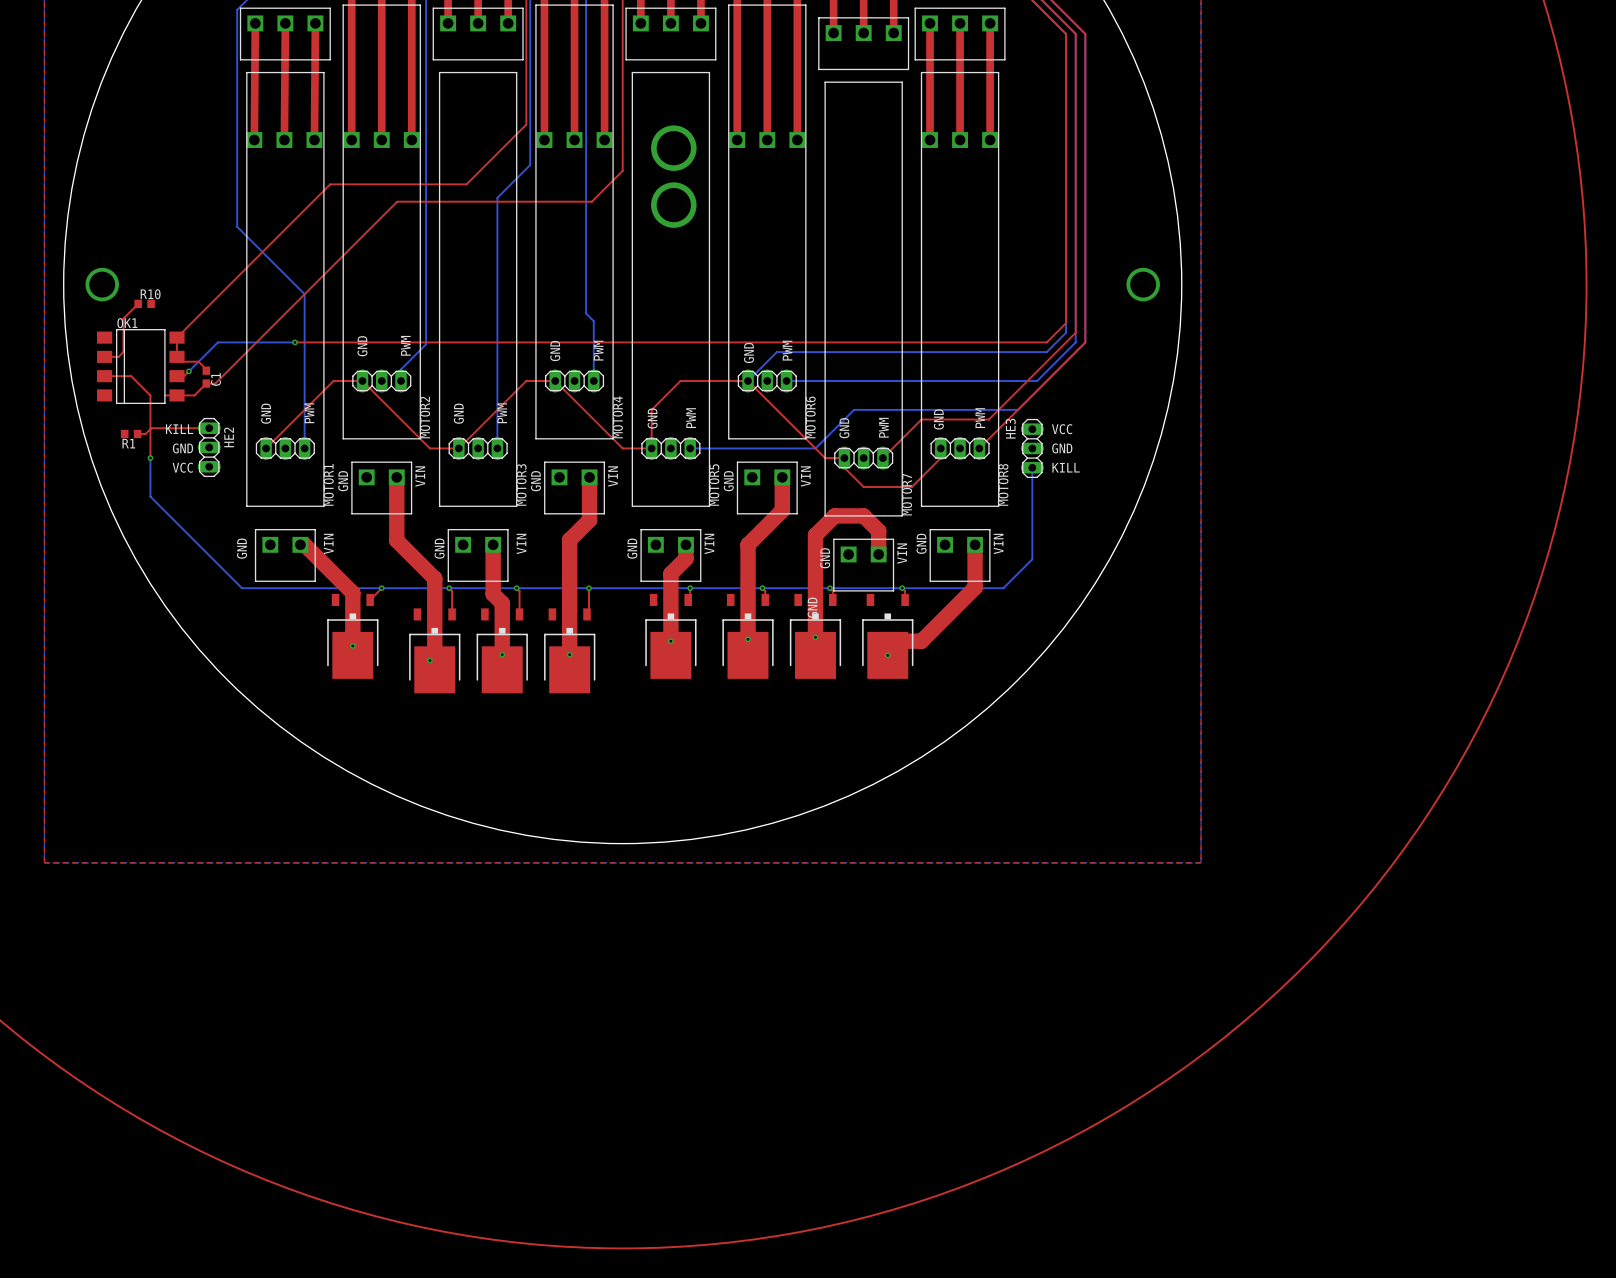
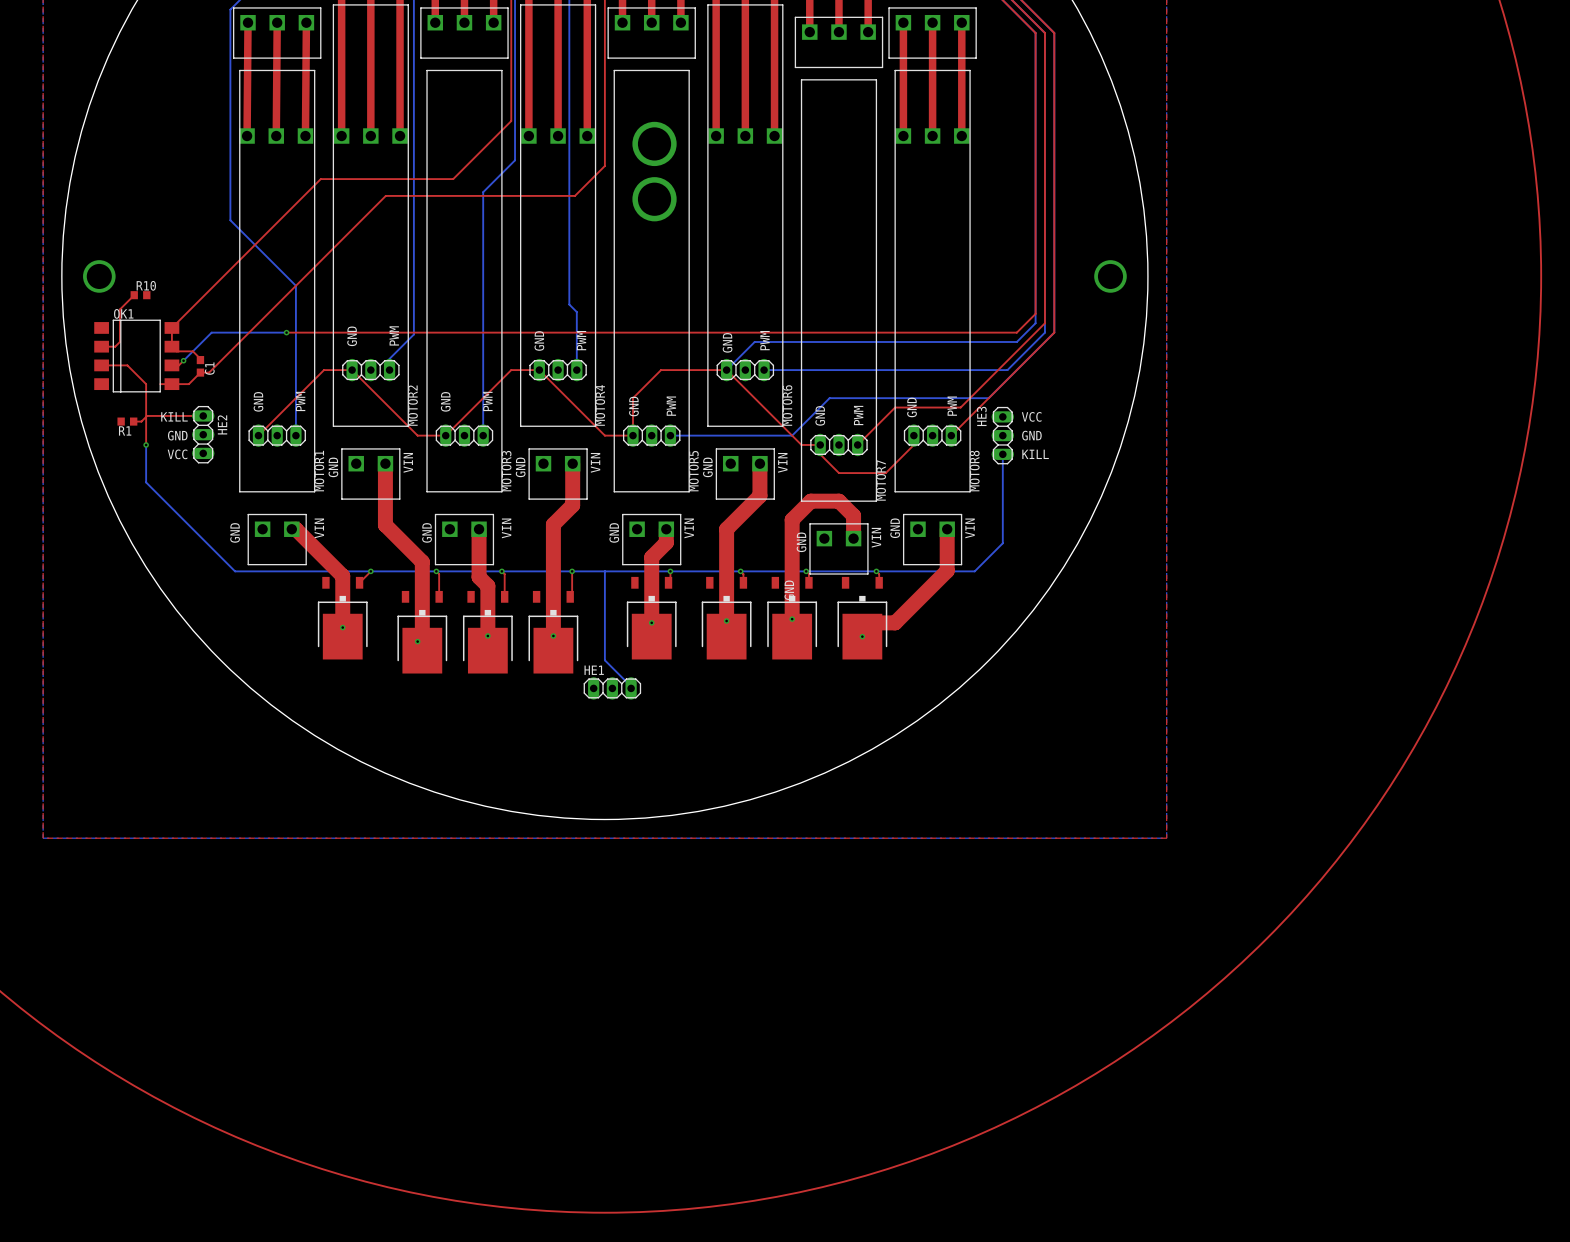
bottom track: none -> (604, 571) (604, 660) (631, 688)
HE1: none -> (612, 688)

